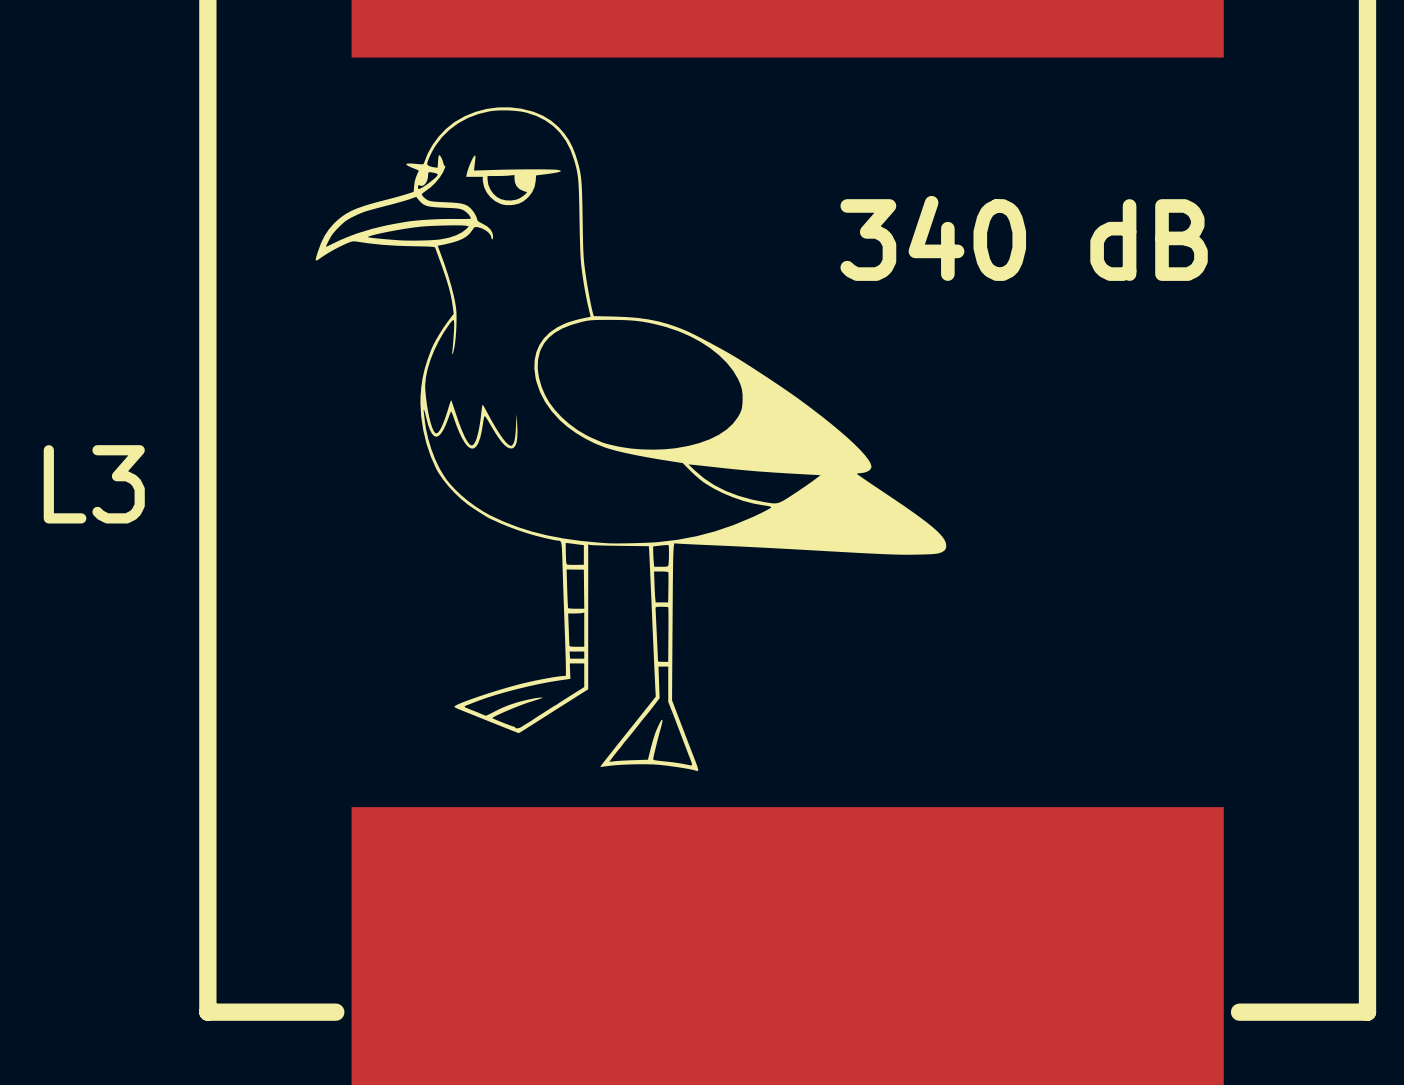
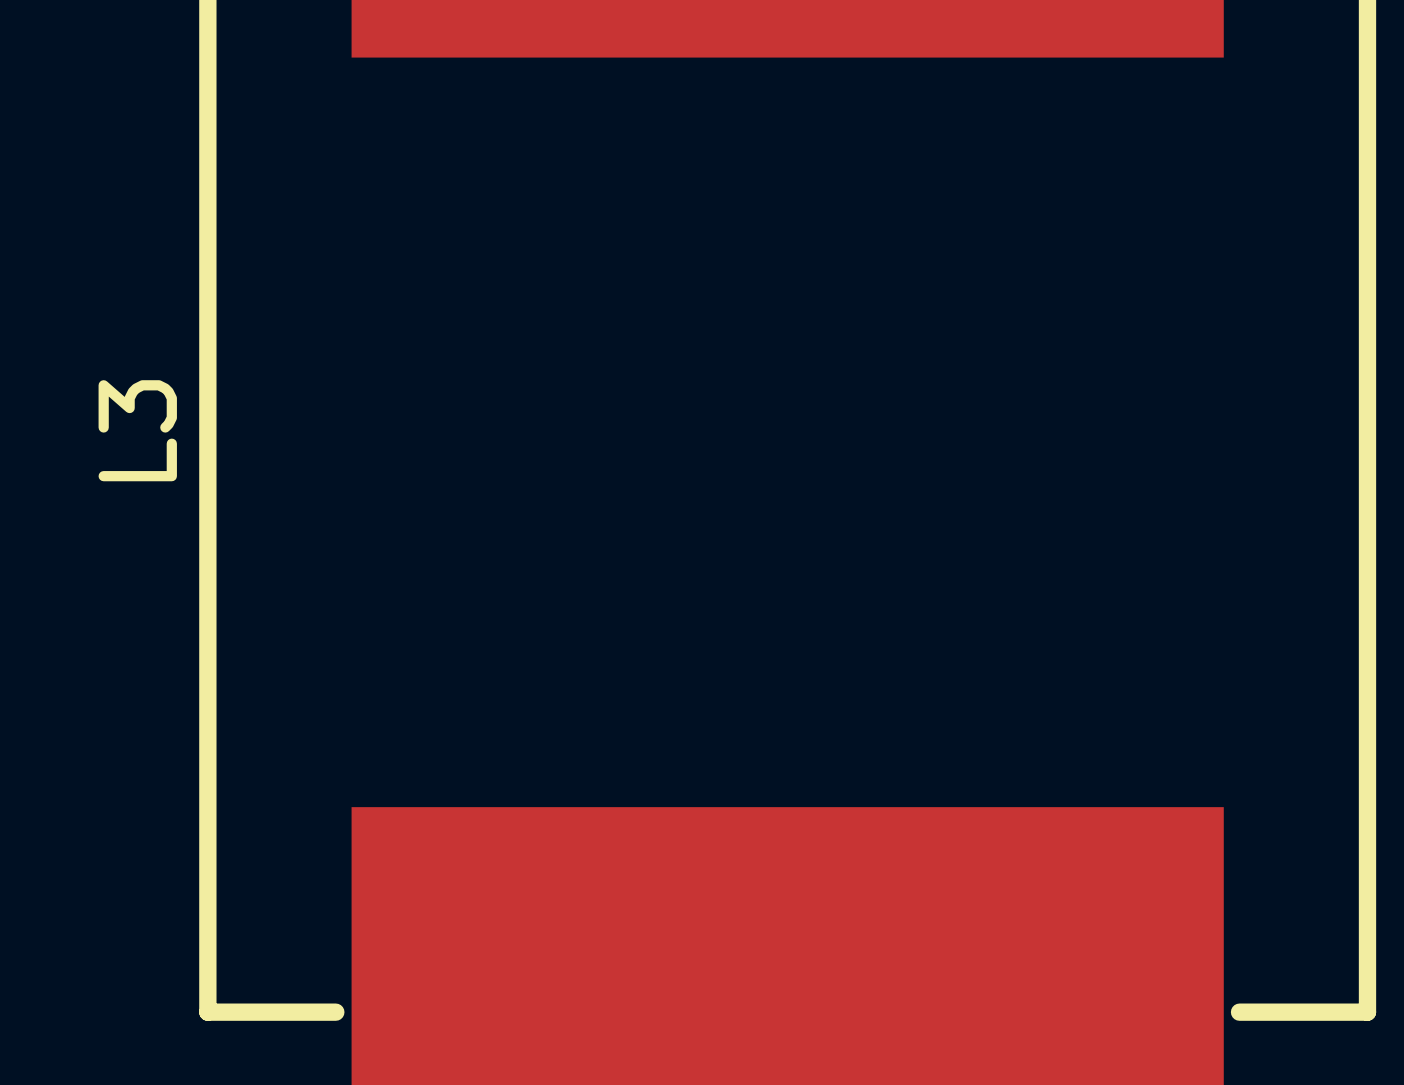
drawing: [315, 107, 947, 772] -> none
text: 340 dB (1024, 238) -> none
L3 name rotation: 0° (94, 484) -> 90° counterclockwise (137, 430)

